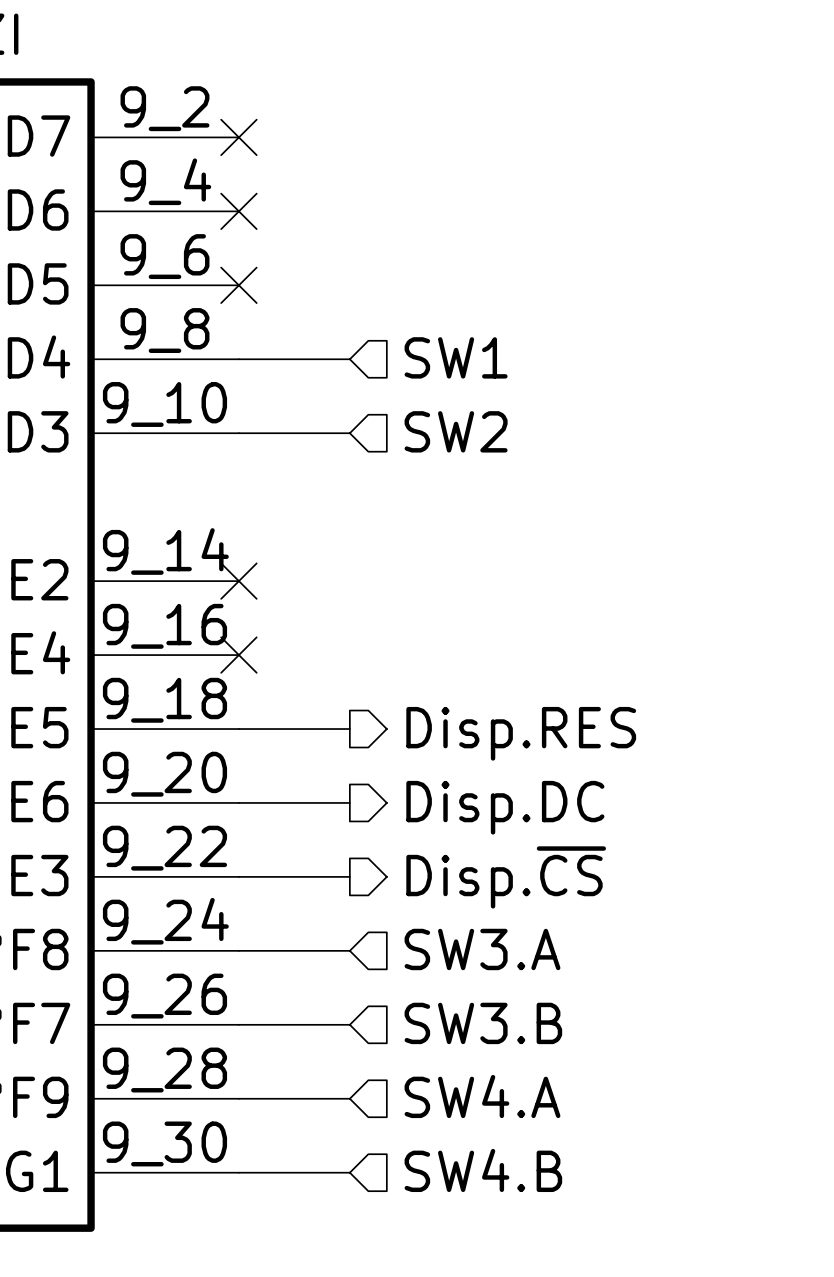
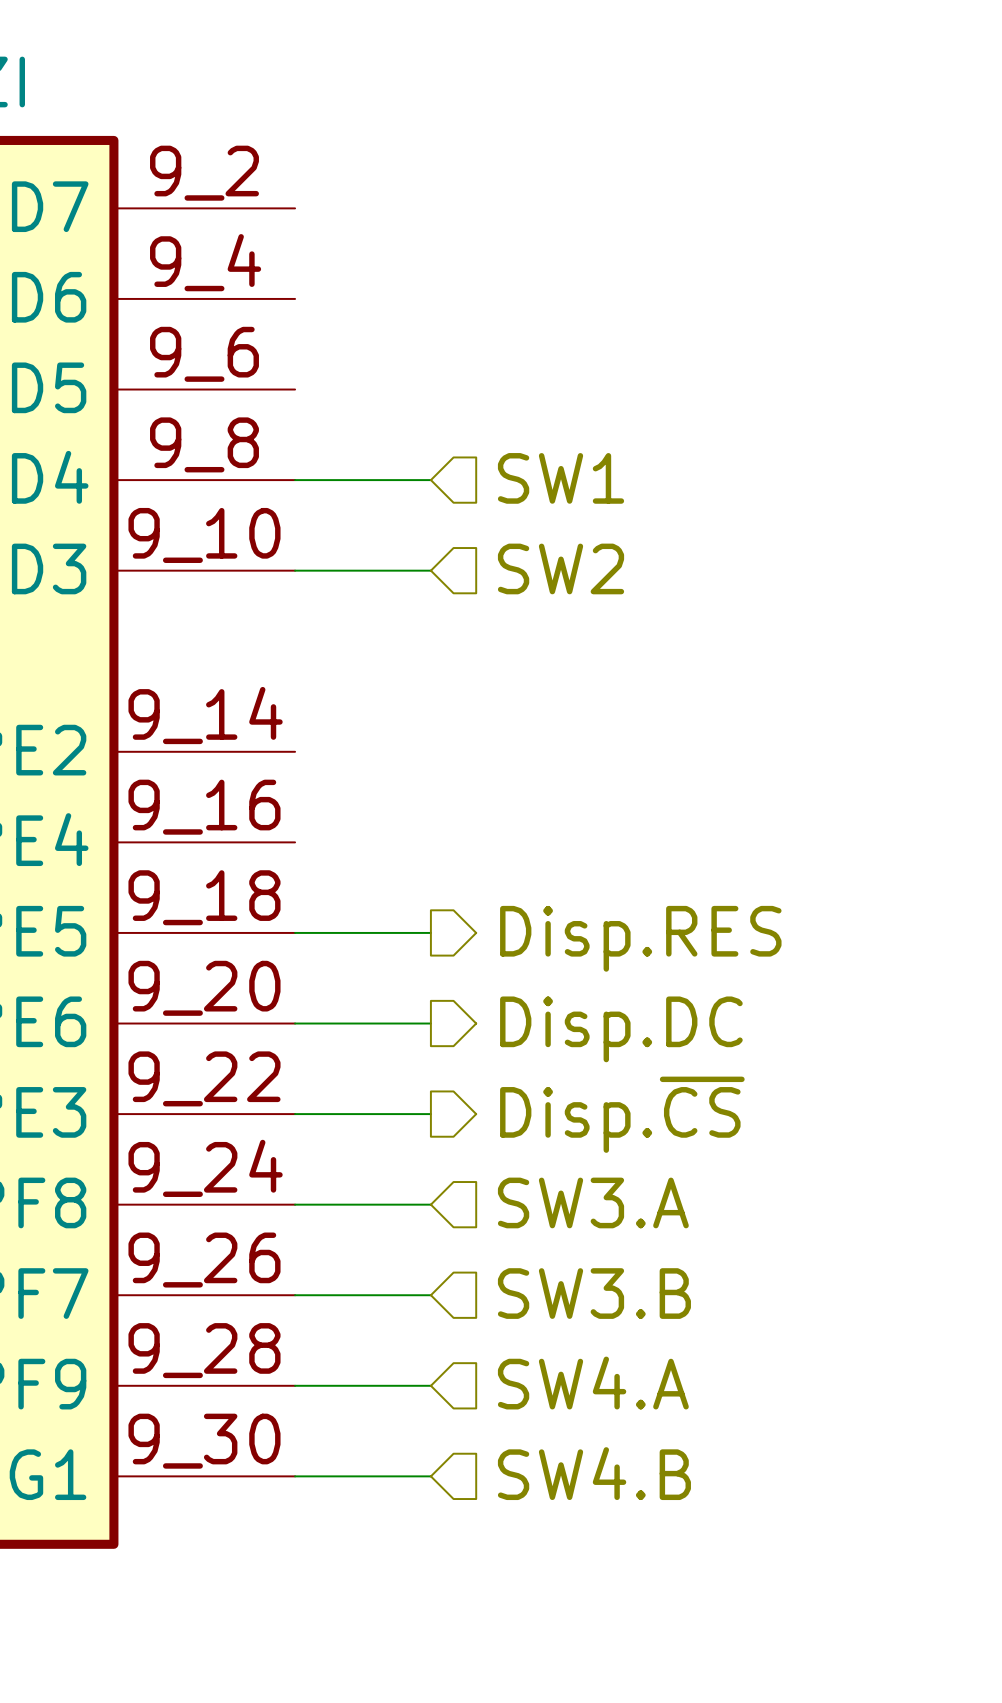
no-connect mark: (238, 137) -> none
no-connect mark: (238, 211) -> none
no-connect mark: (238, 285) -> none
no-connect mark: (238, 581) -> none
no-connect mark: (238, 655) -> none

